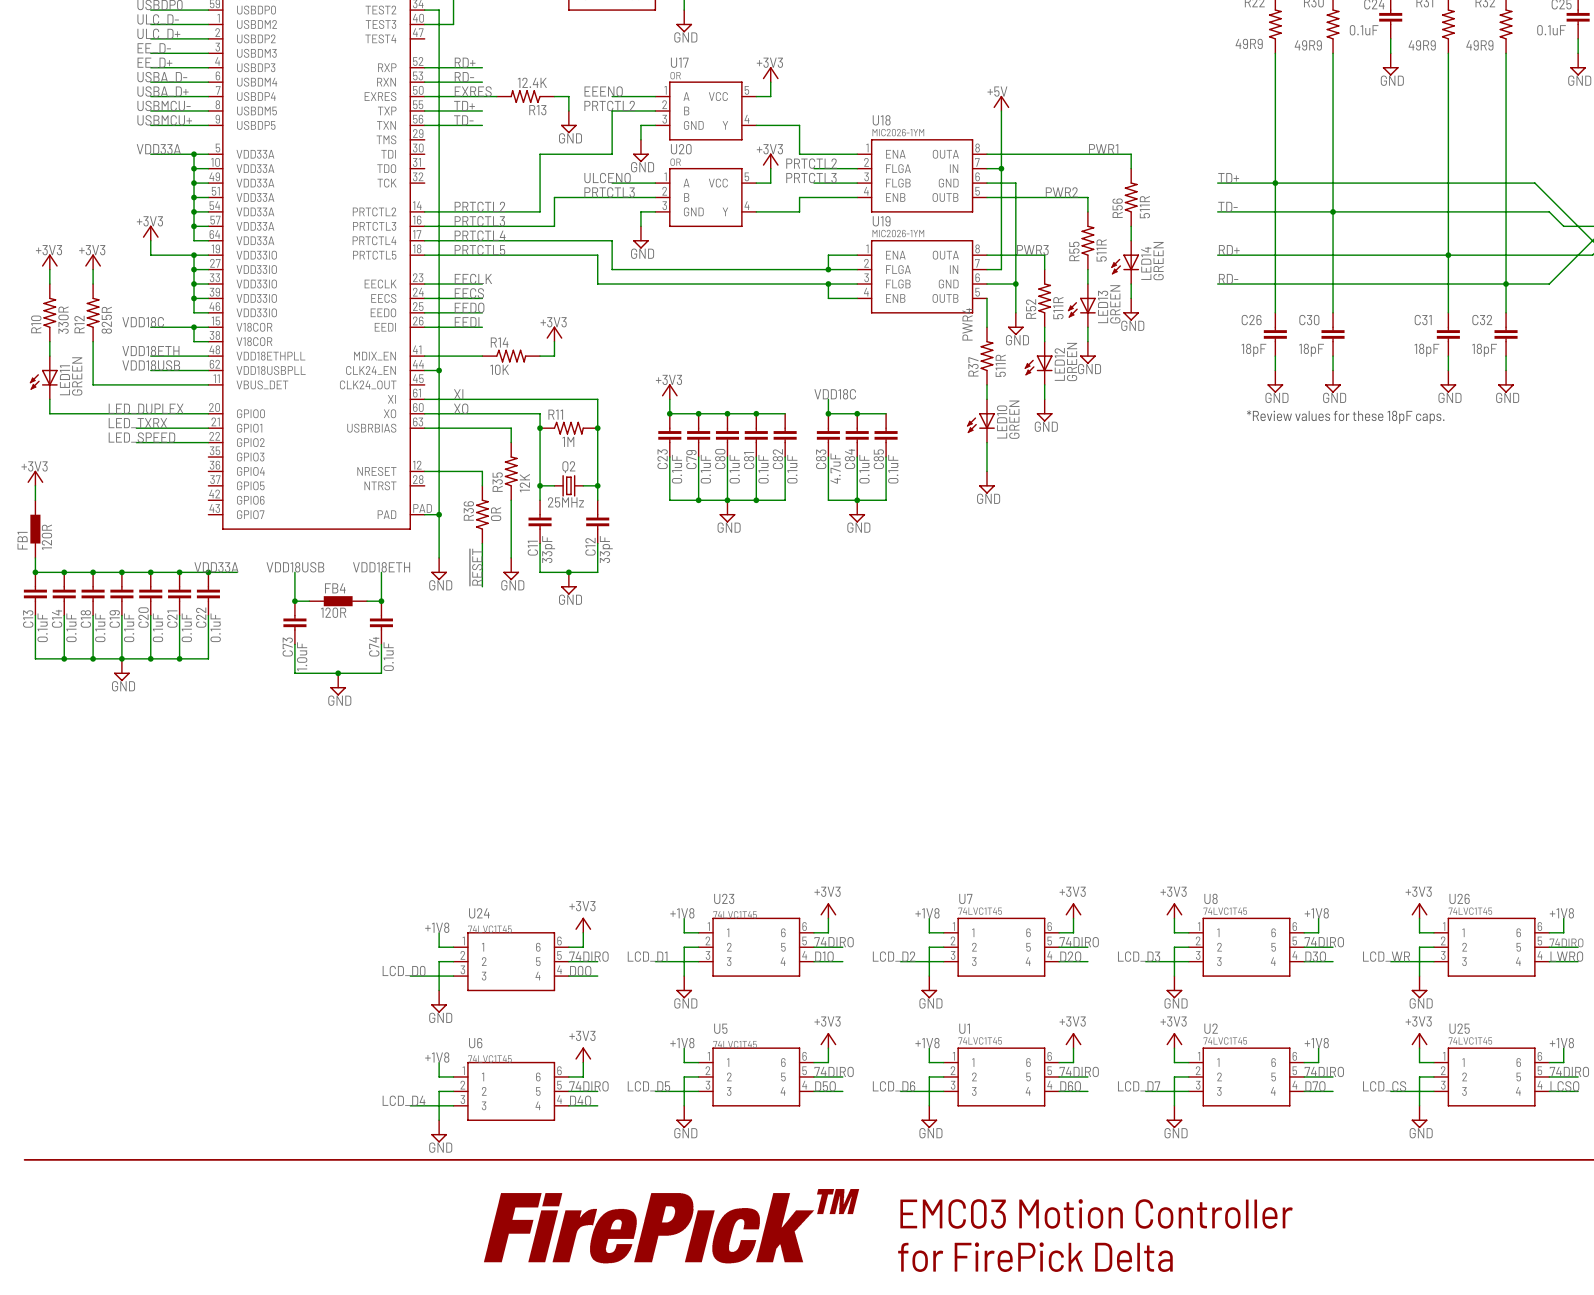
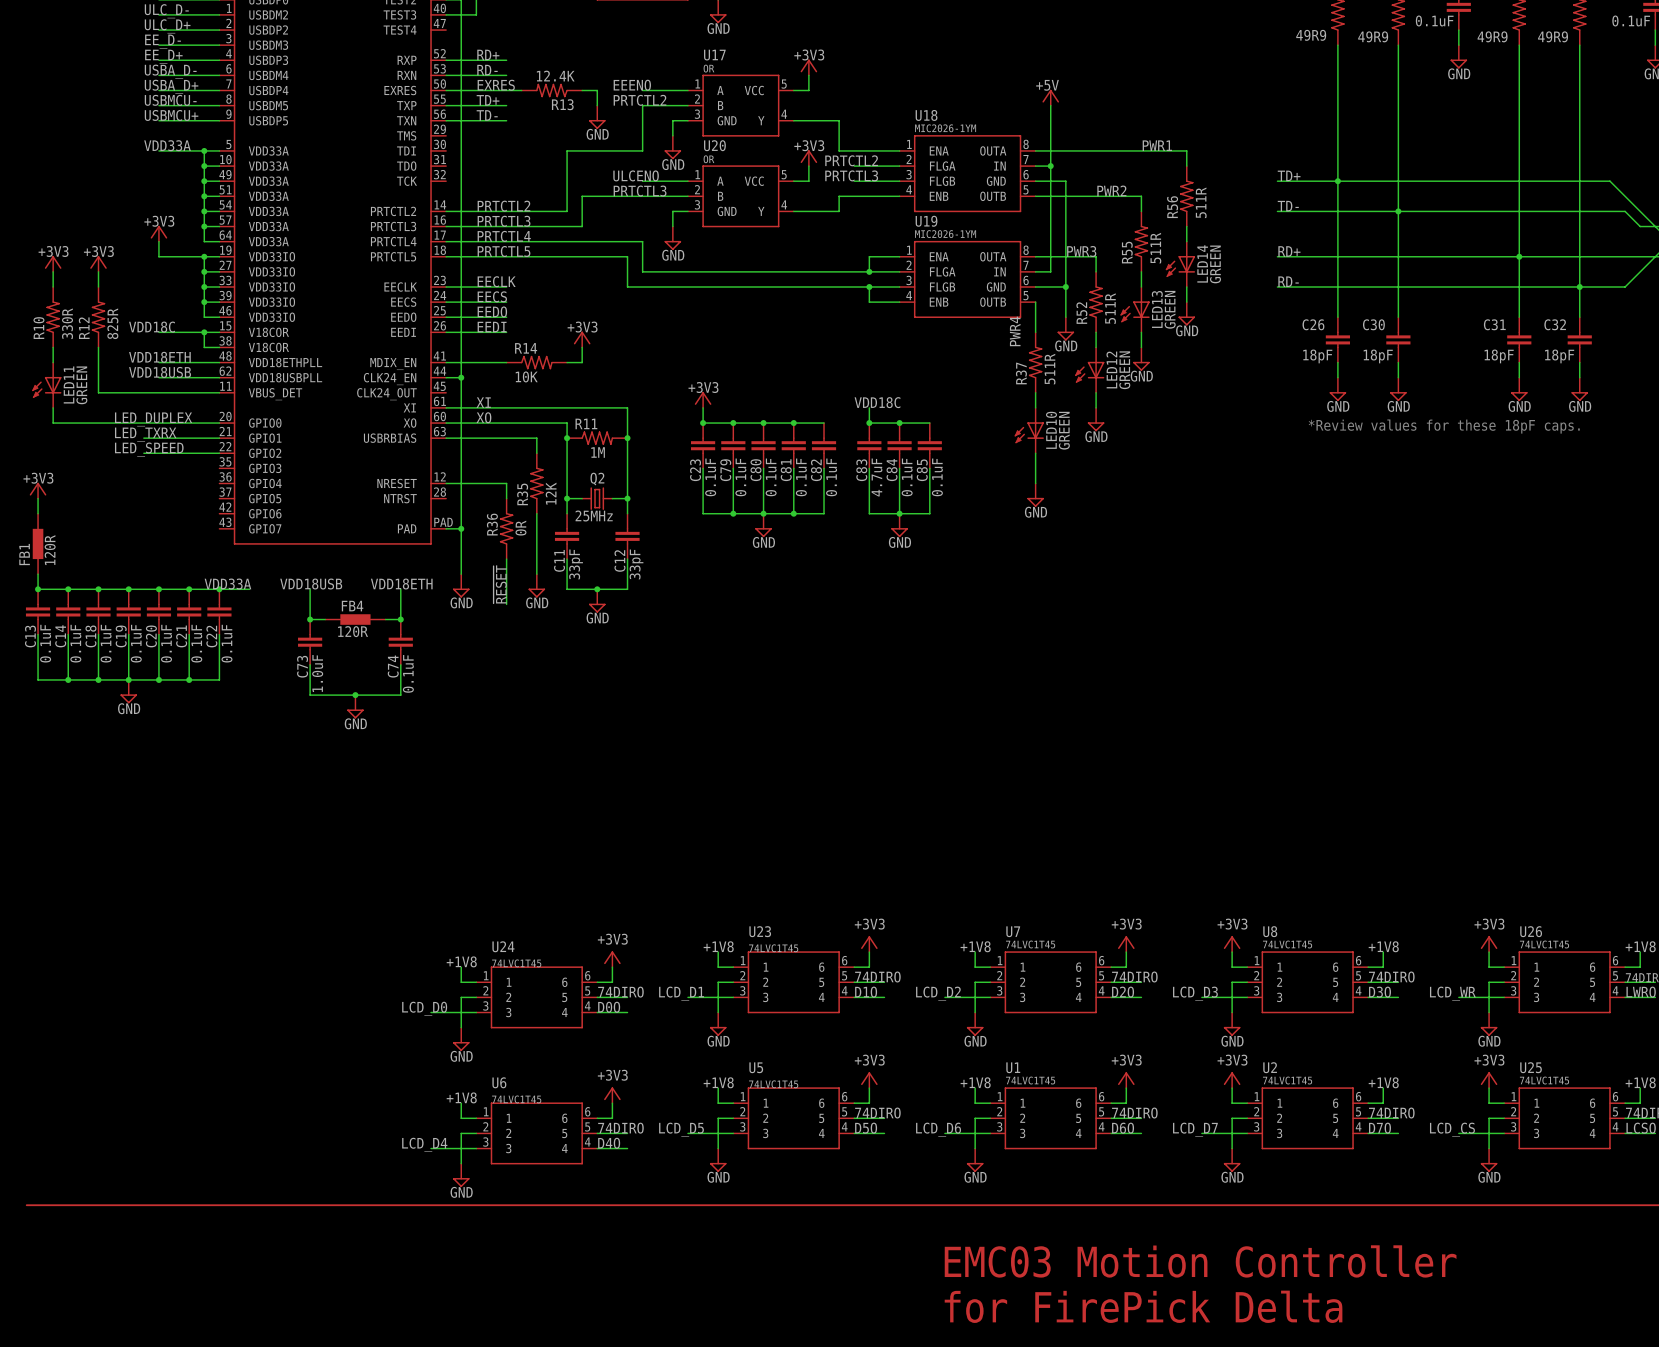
part: (671, 1226) -> none

